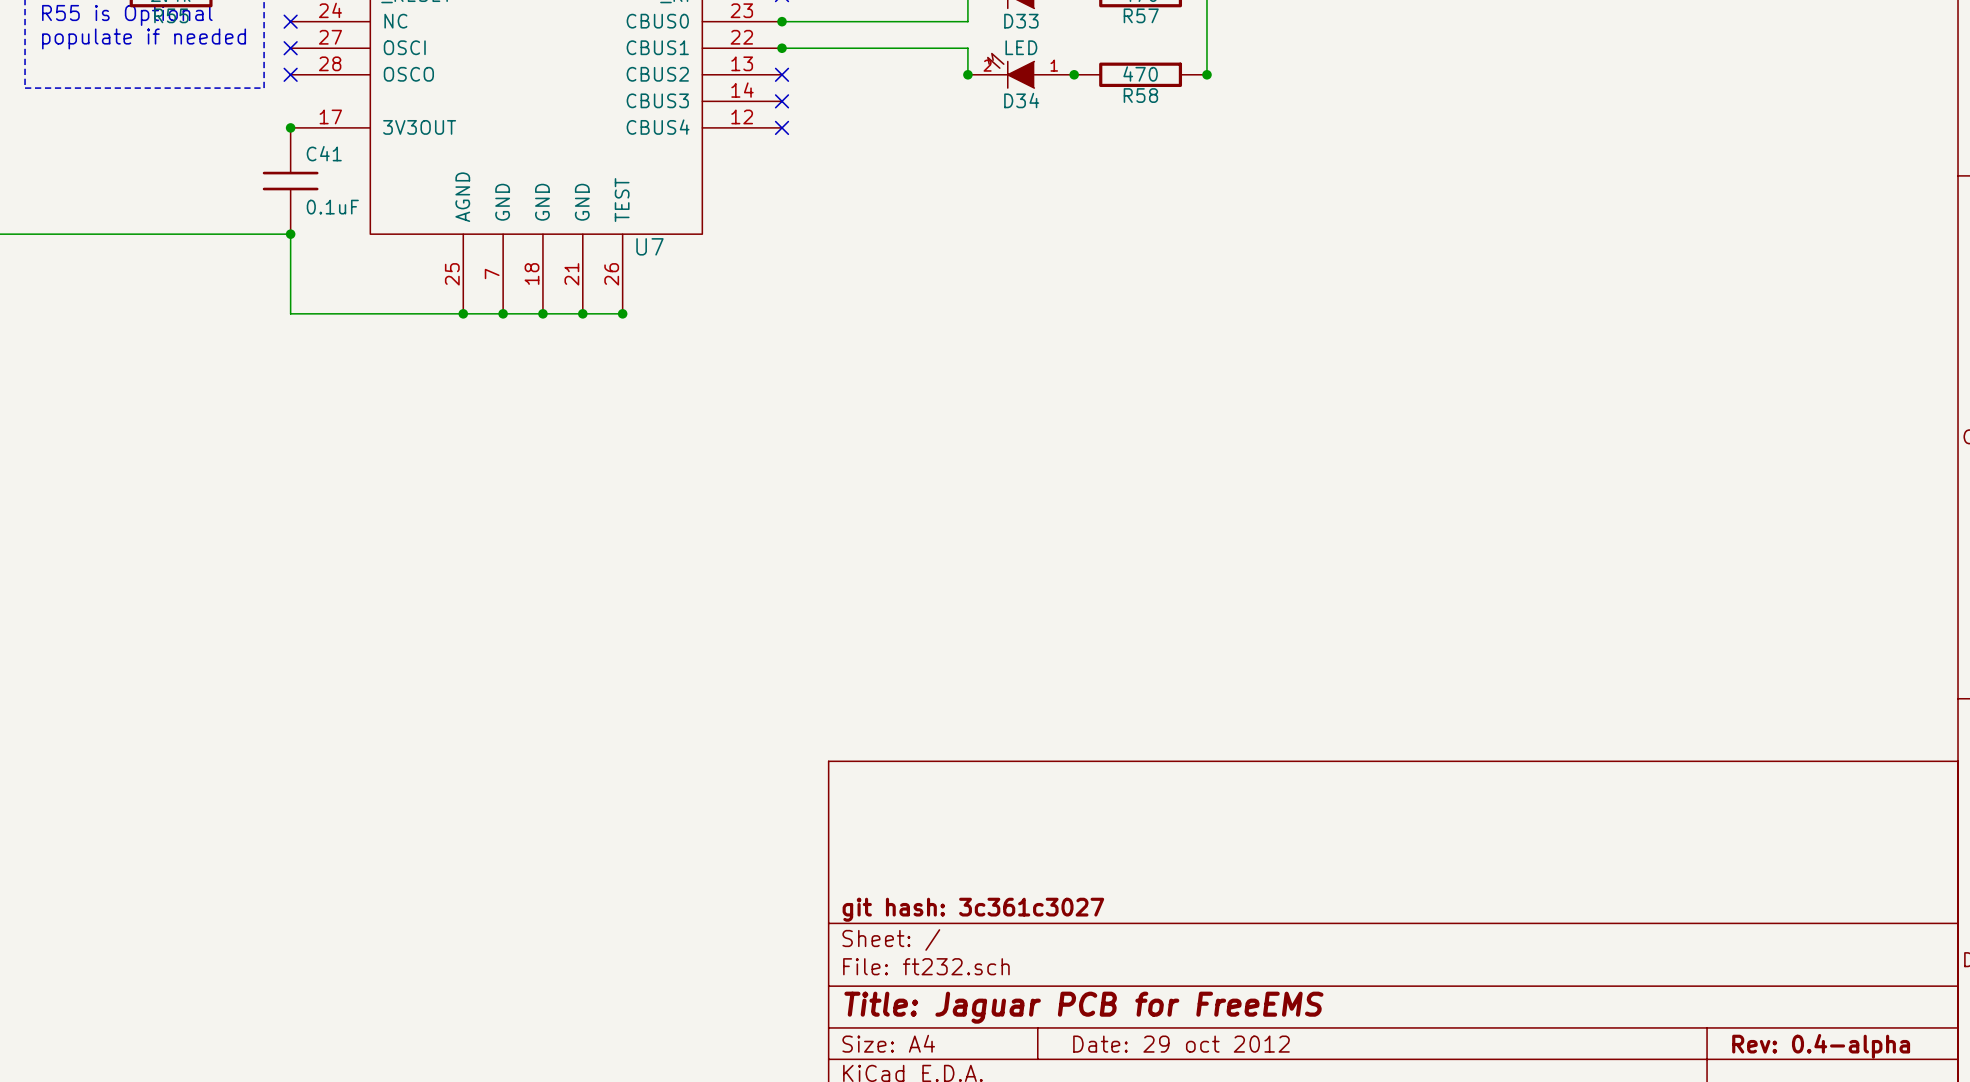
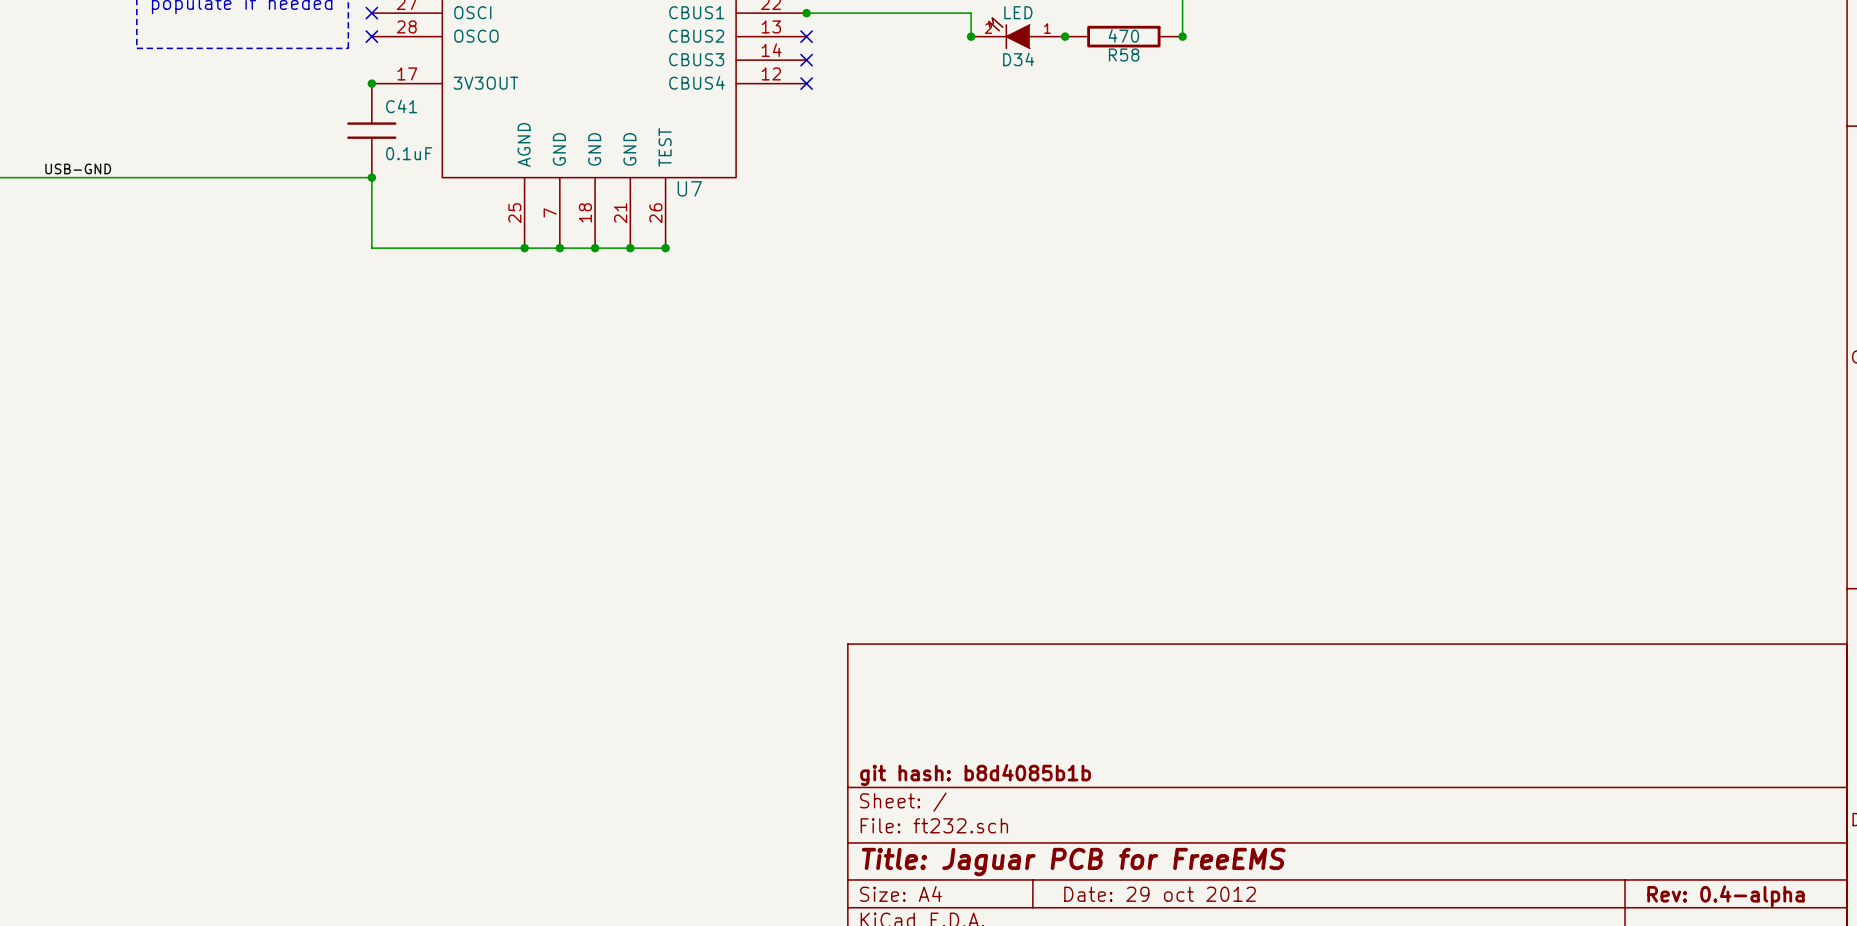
title block: git hash: 3c361c3027 (973, 909) -> git hash: b8d4085b1b (975, 775)

